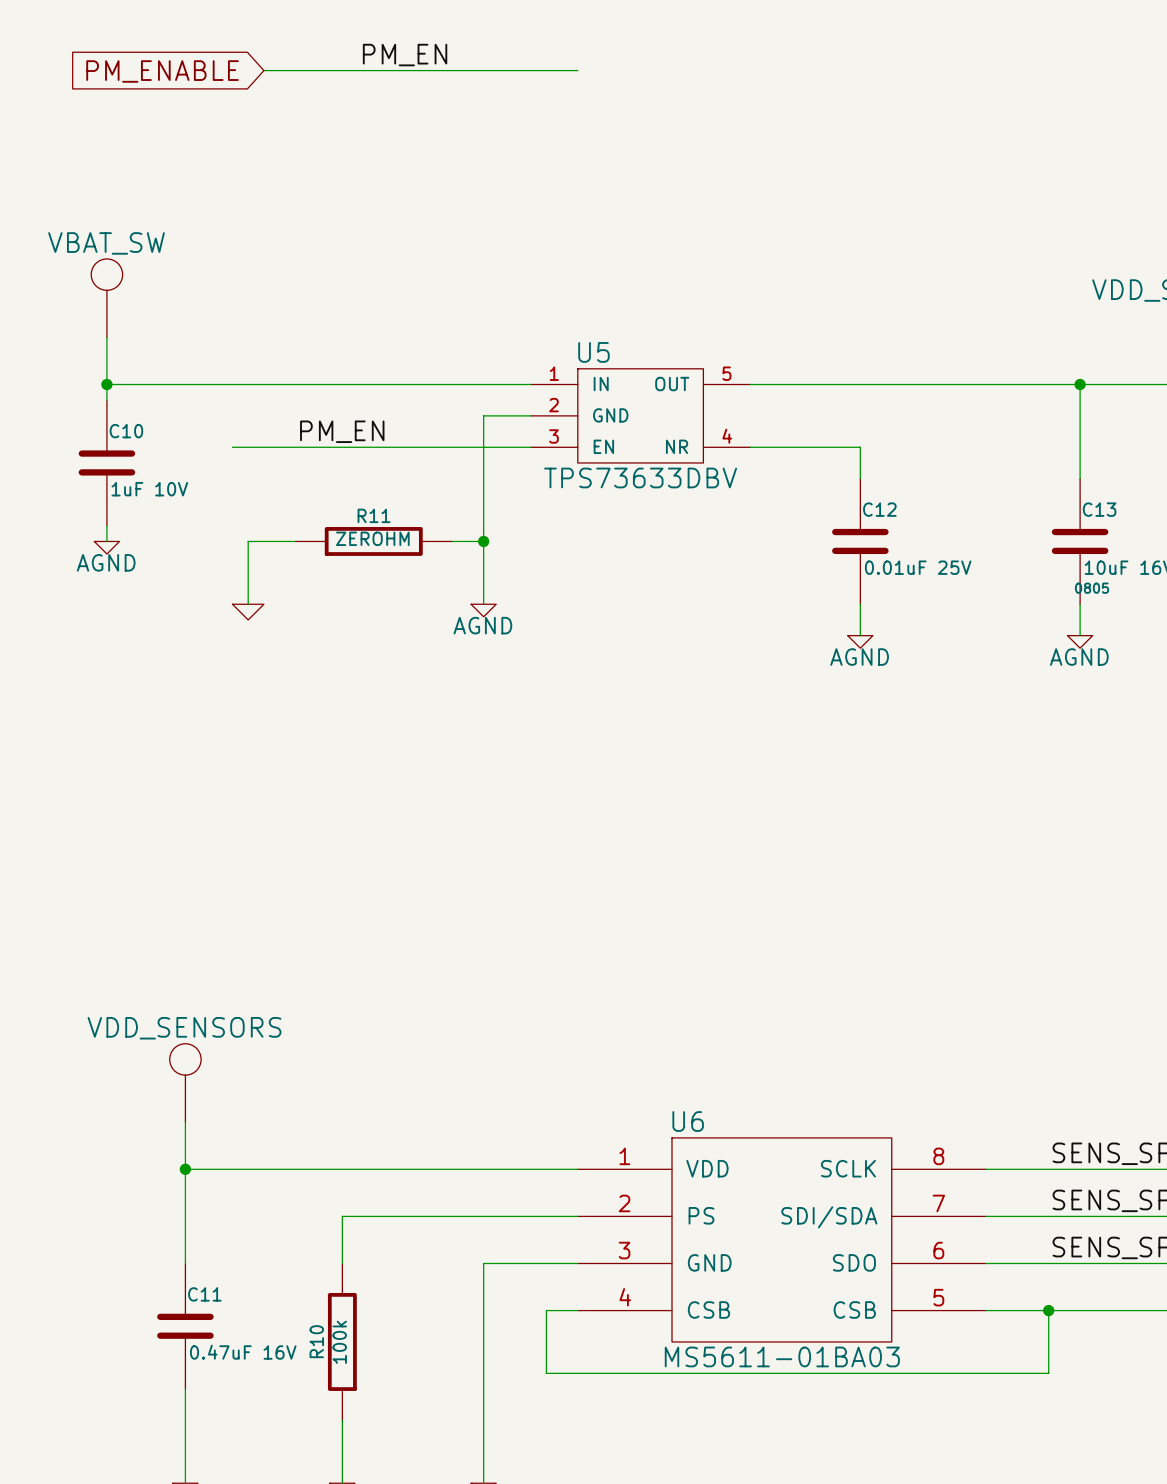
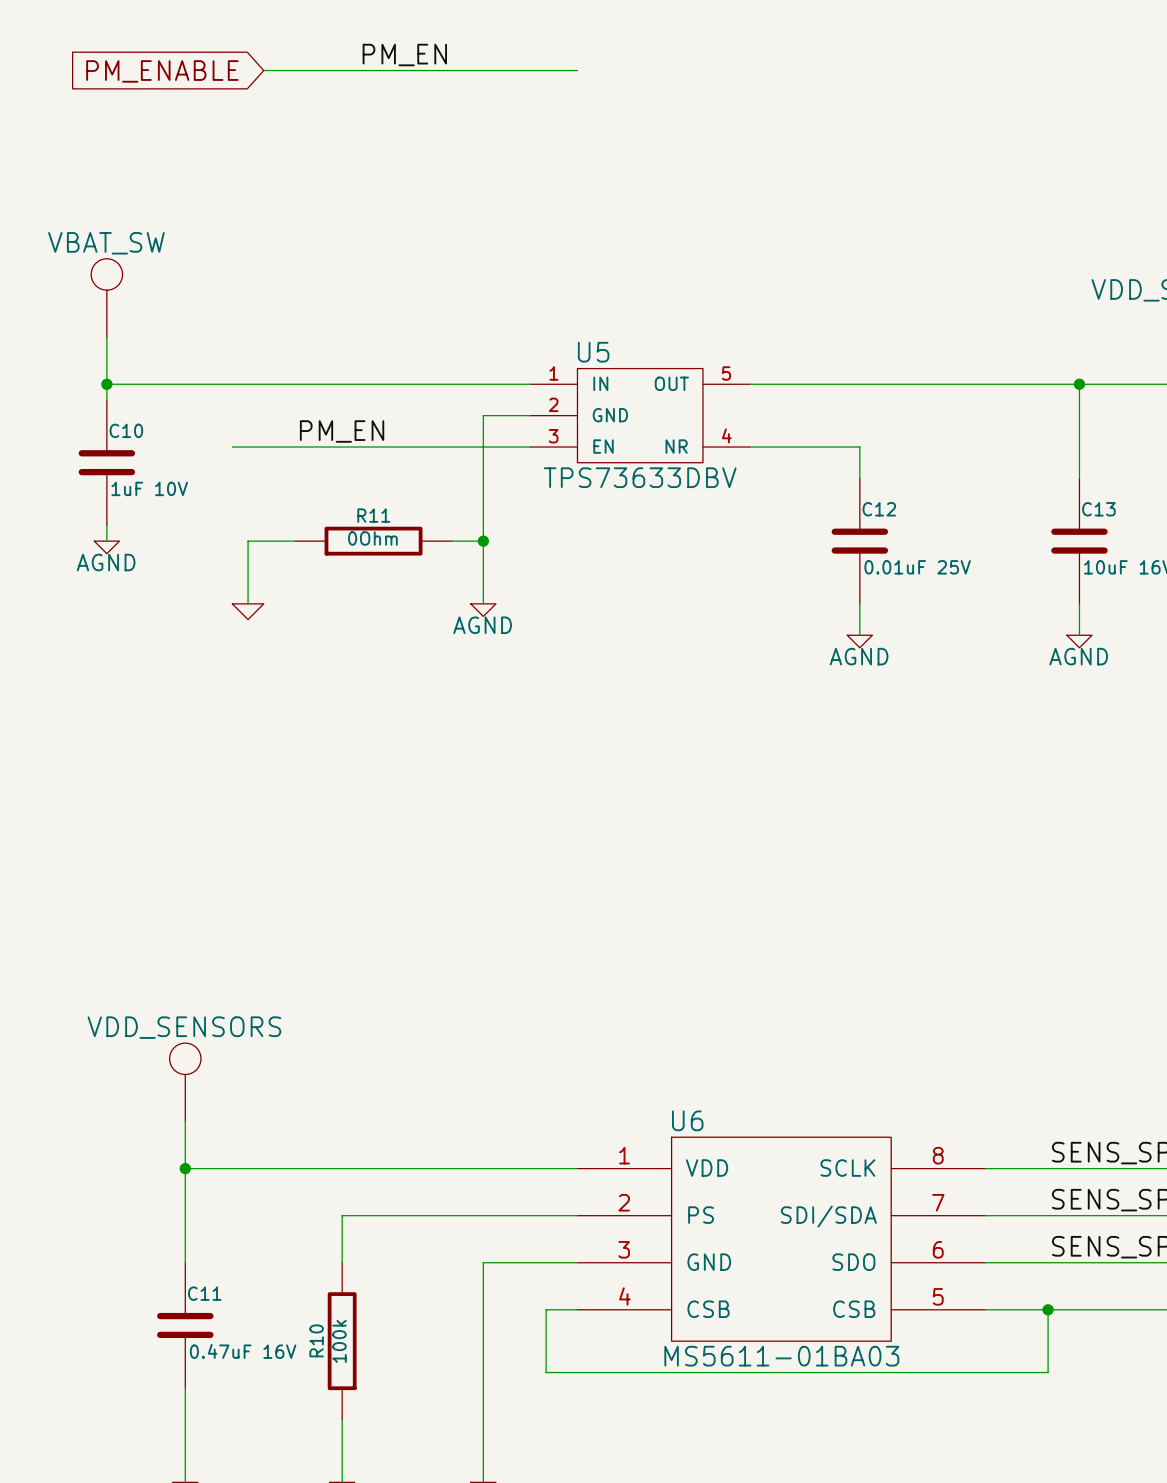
R11 value: ZEROHM (372, 538) -> 0Ohm (372, 538)
C13 text: 0805 (1092, 588) -> none

